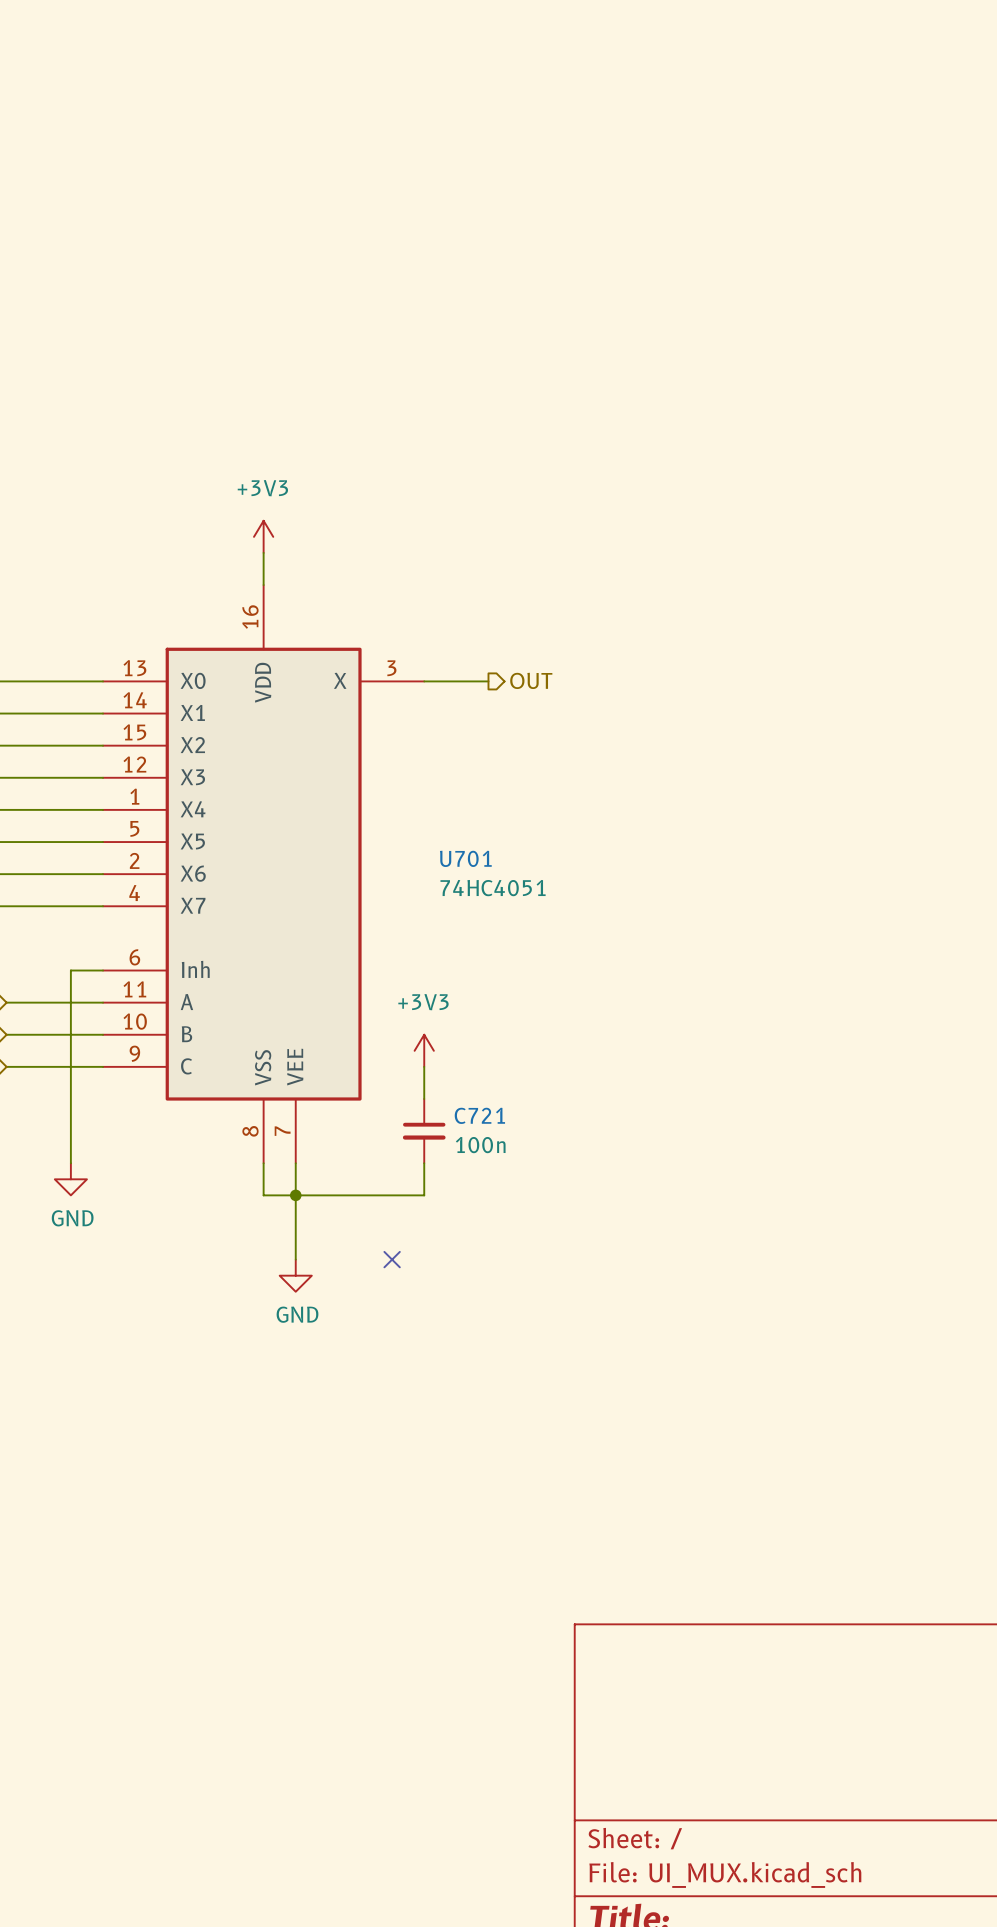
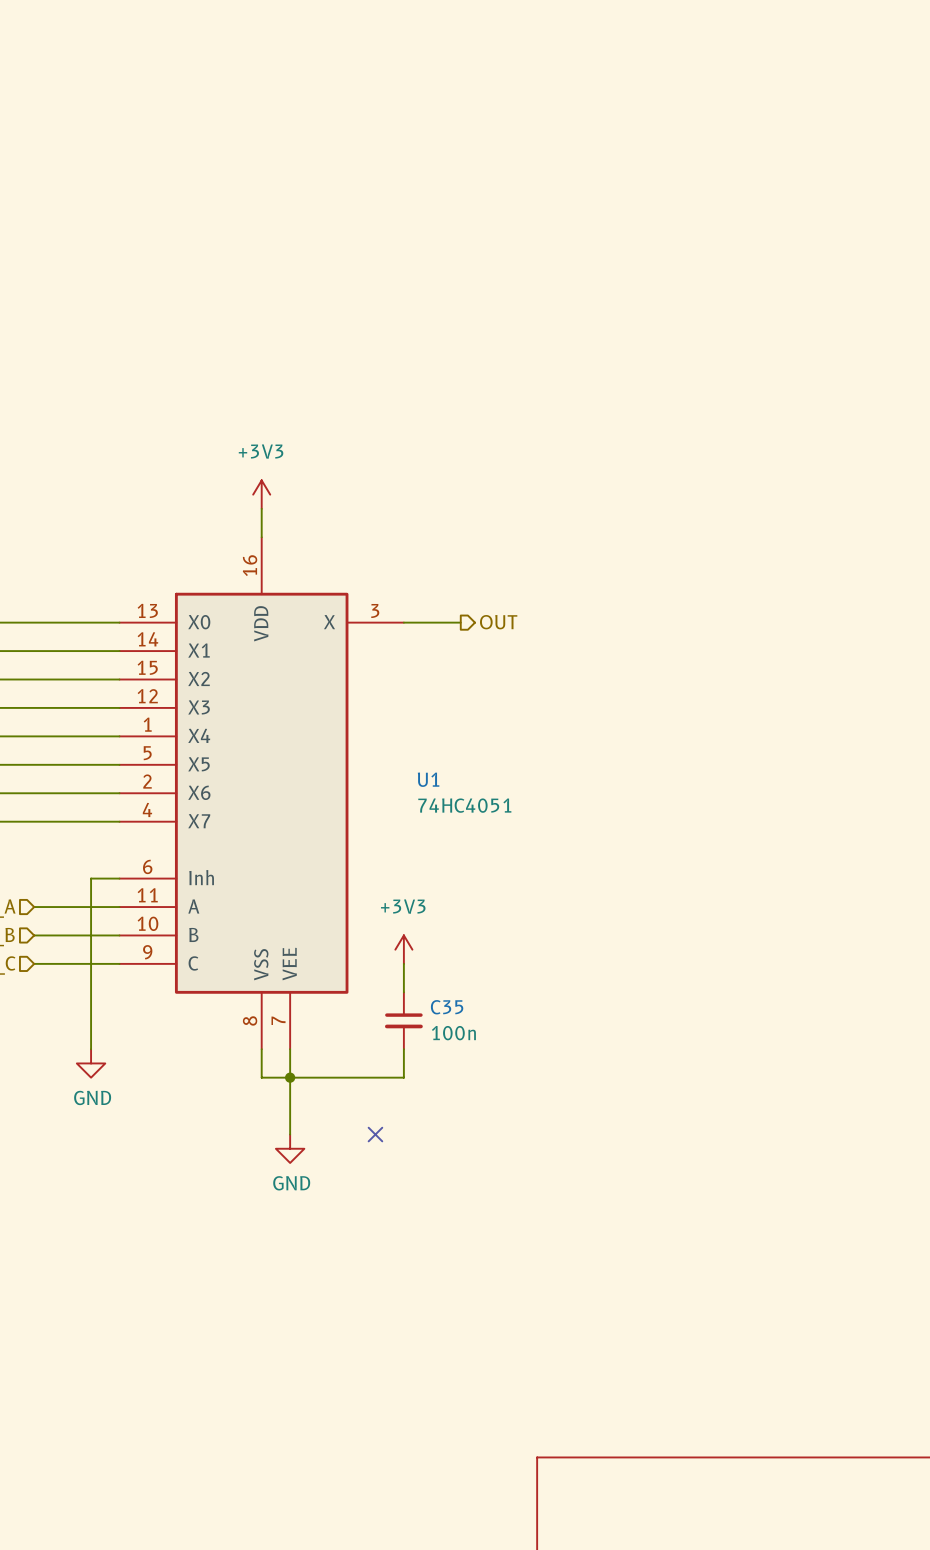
U701 name: U701 (465, 858) -> U1 (428, 779)
C721 name: C721 (479, 1115) -> C35 (447, 1007)

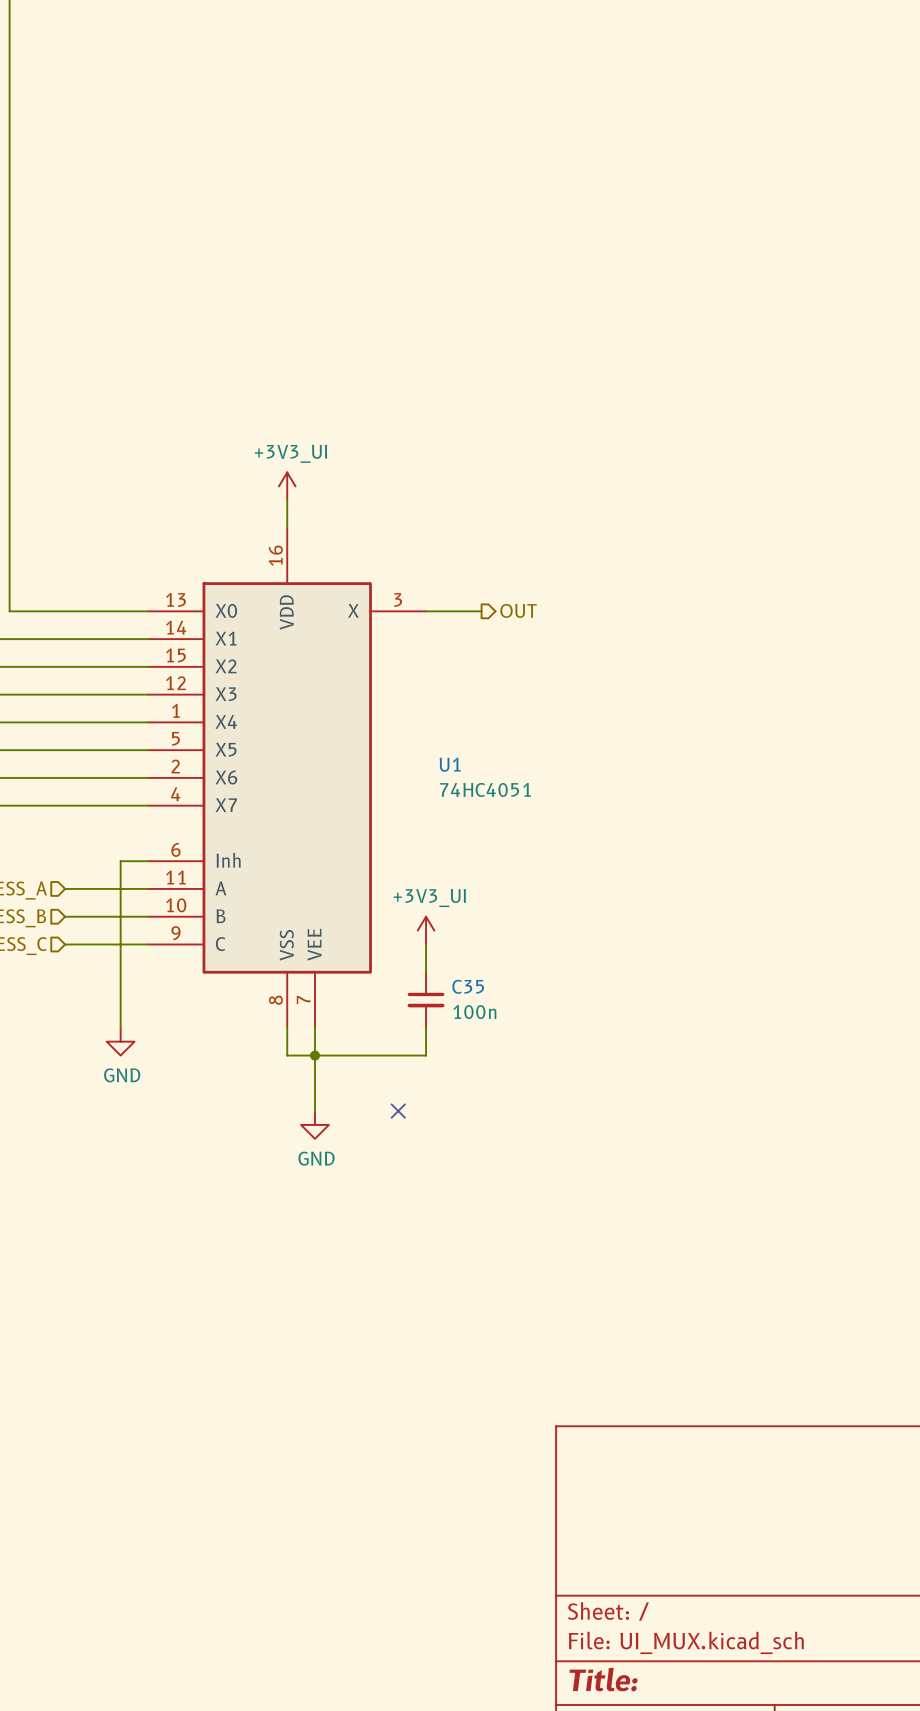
power symbol: +3V3 (261, 494) -> +3V3_UI (287, 486)
power symbol: +3V3 (403, 949) -> +3V3_UI (426, 930)

